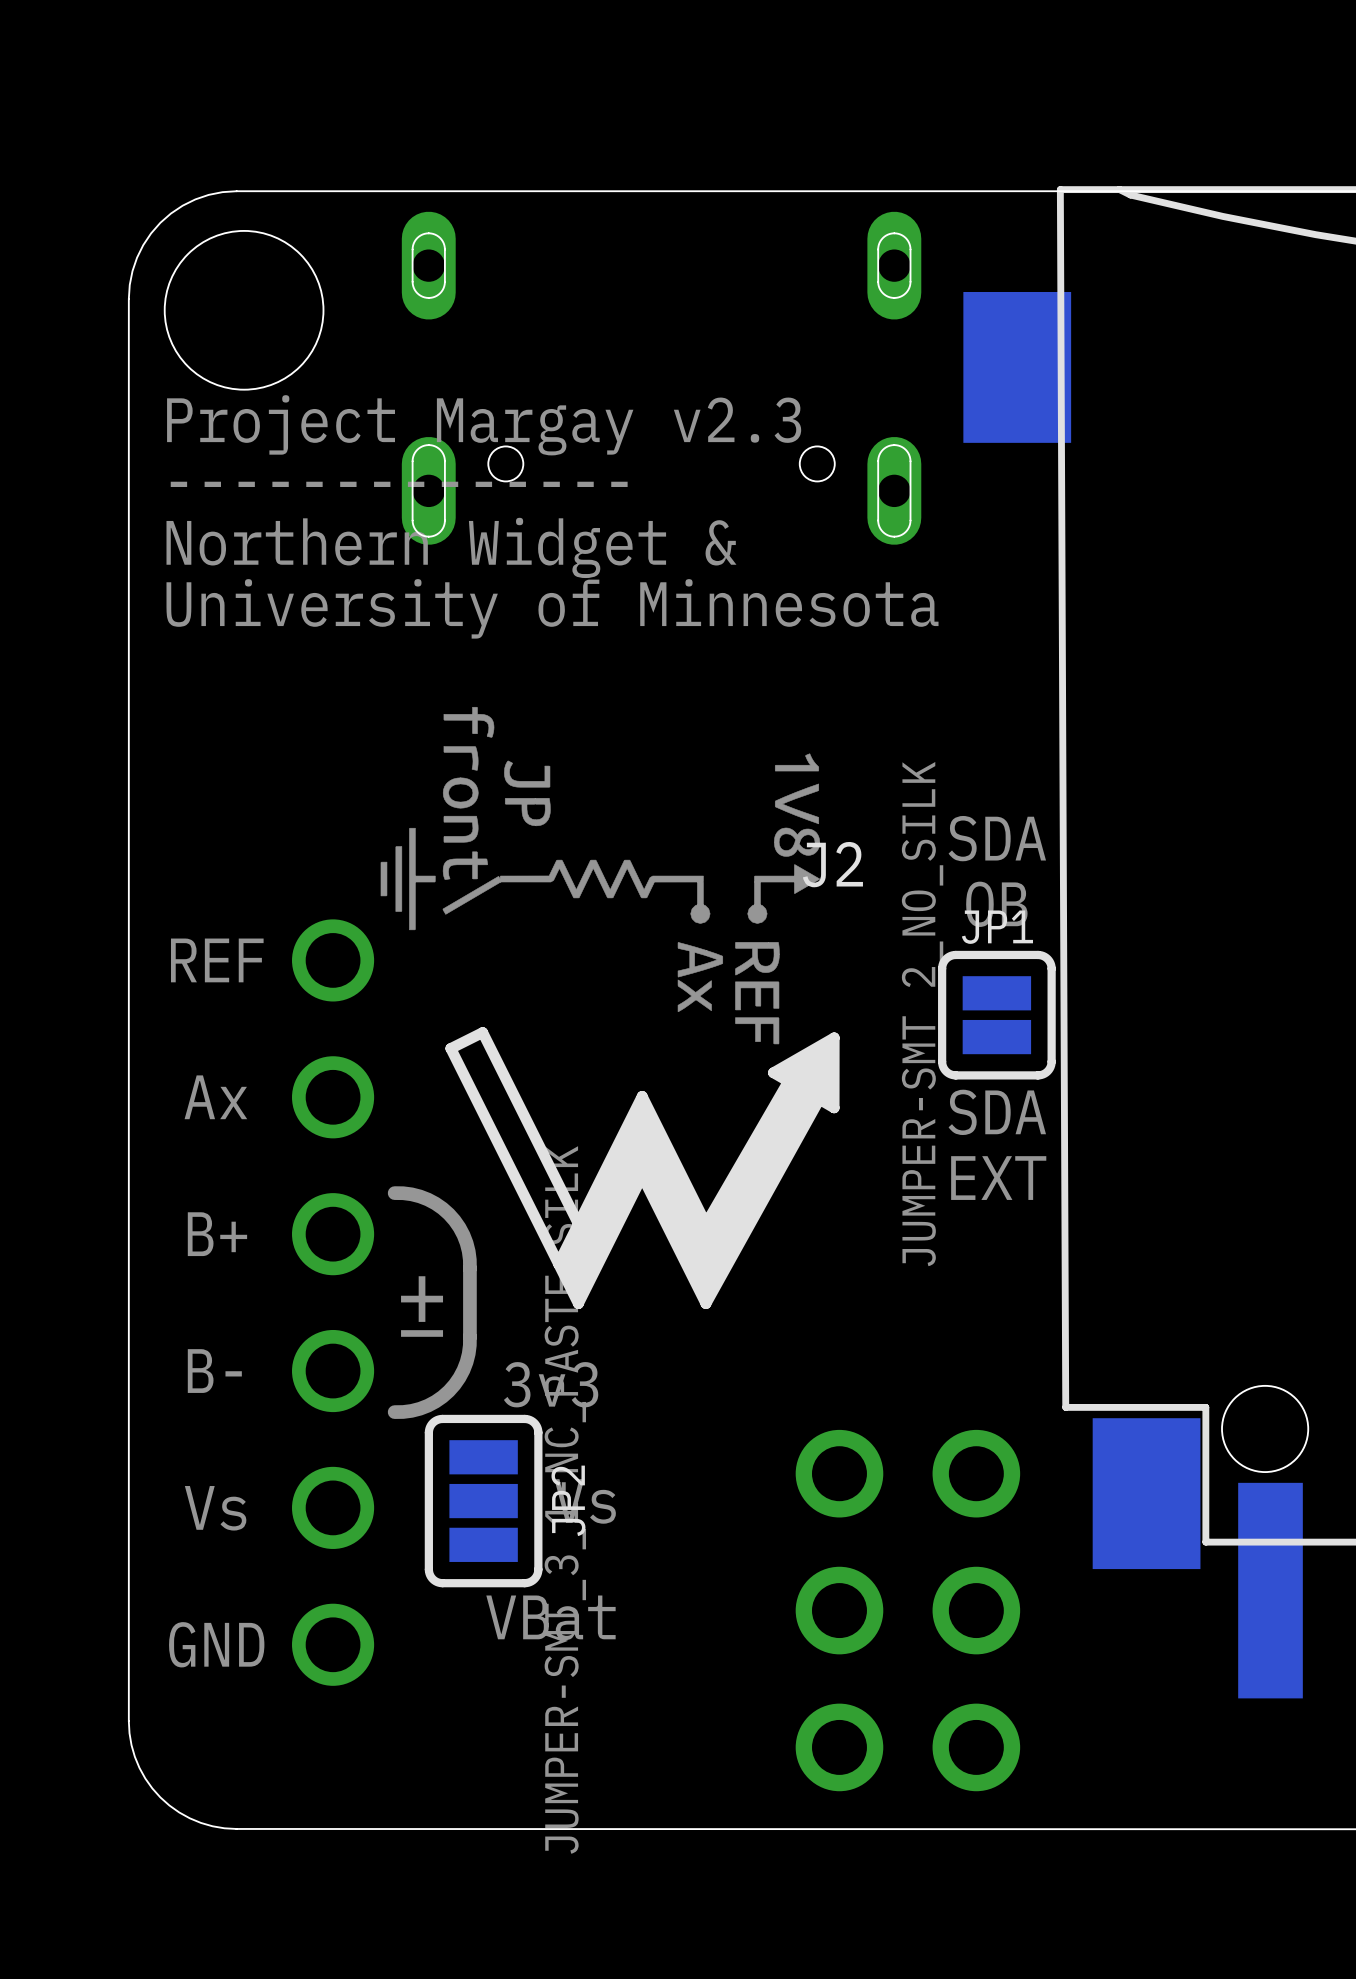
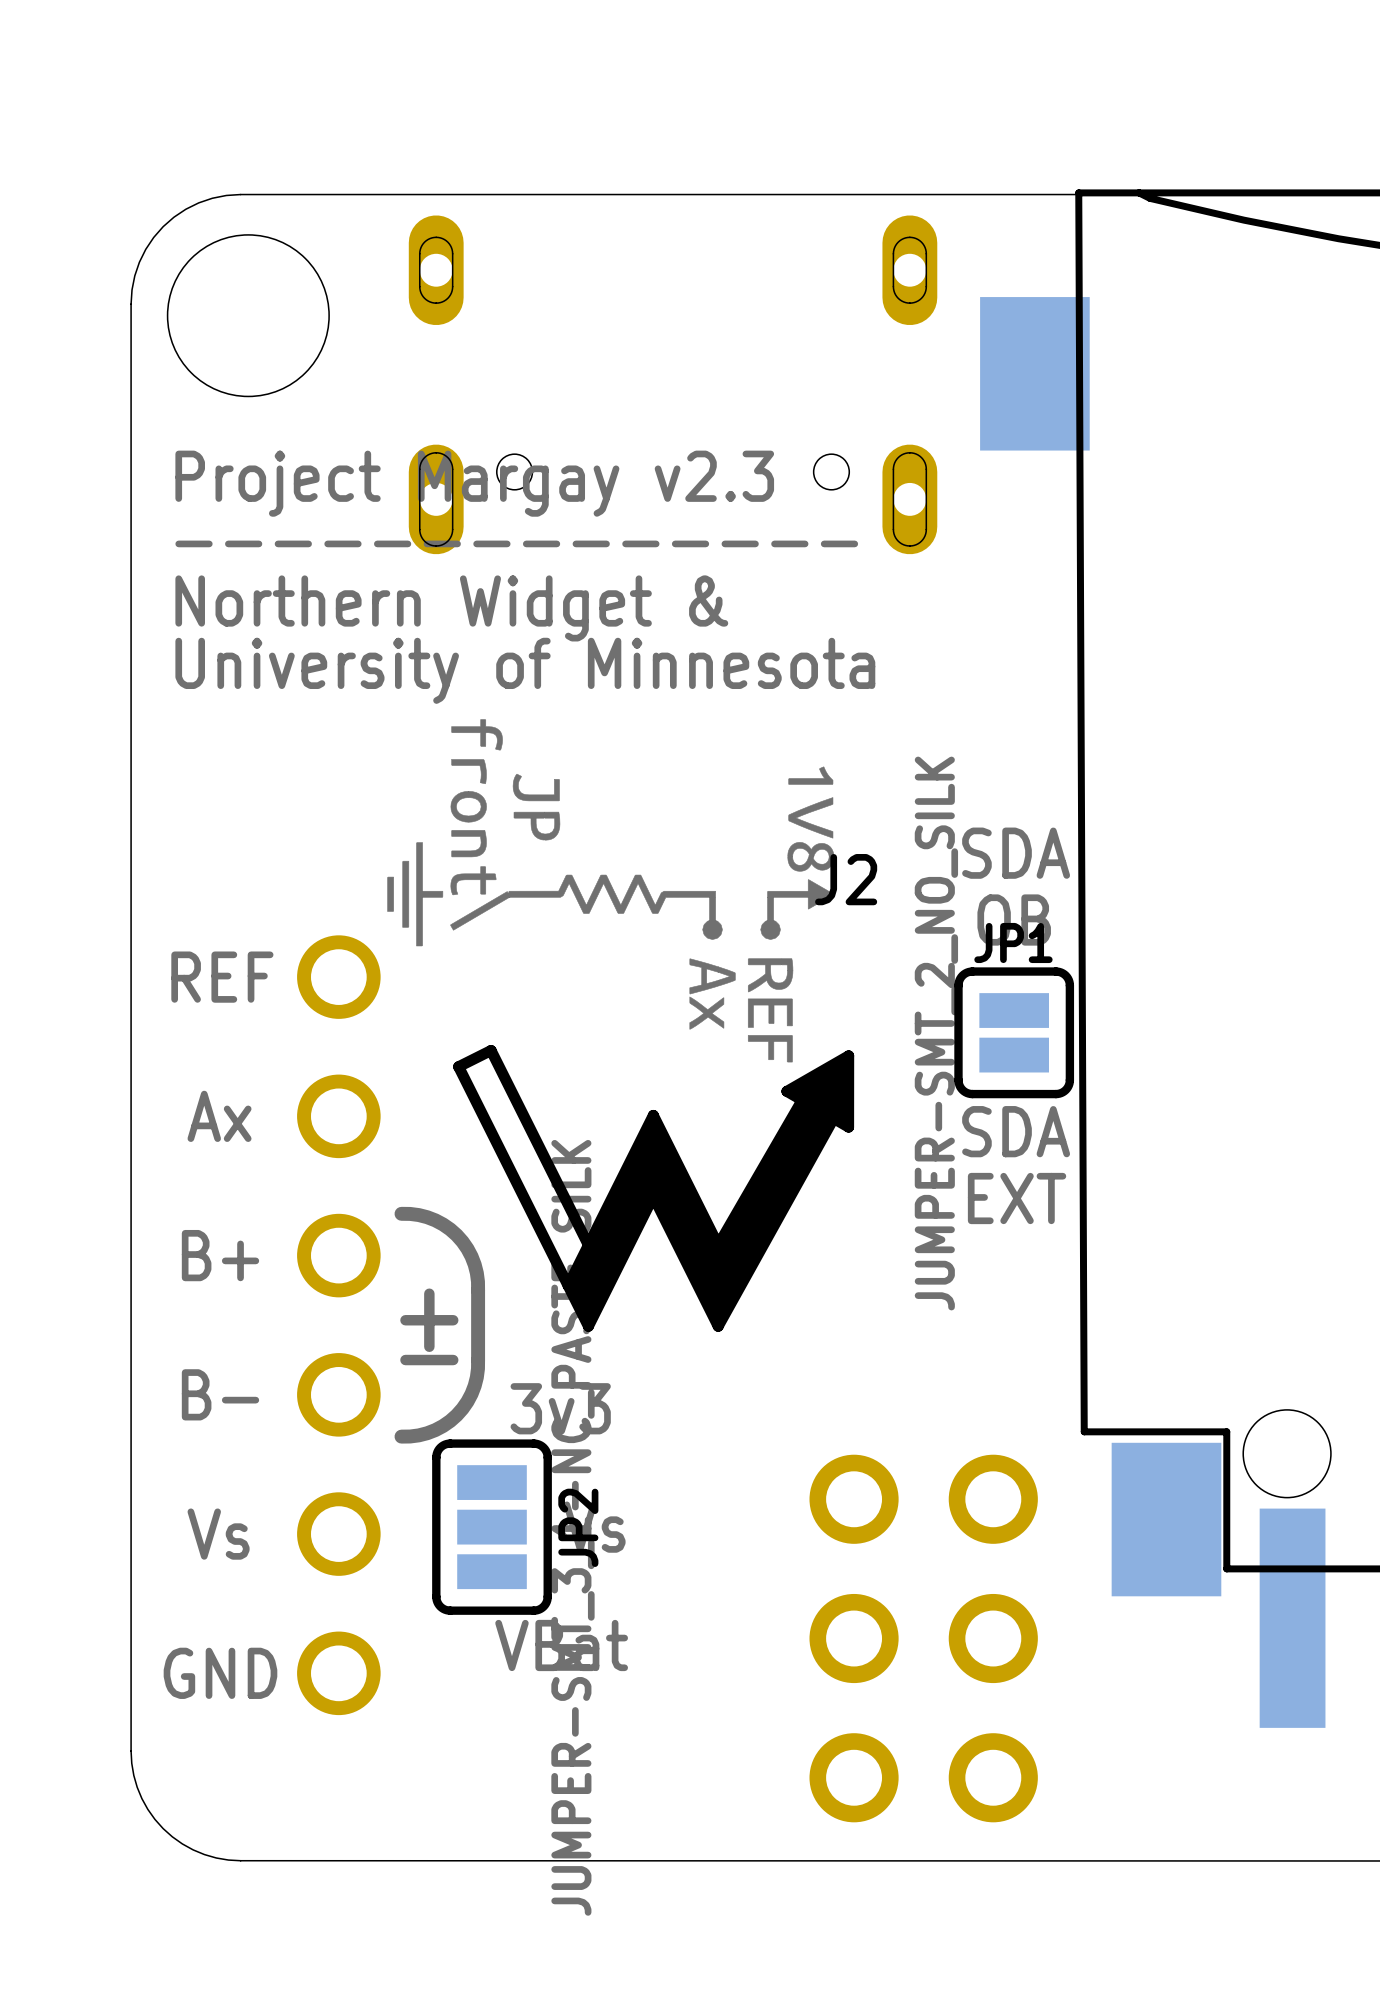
text position: Project Margay v2.3 (484, 425) -> Project Margay v2.3 (474, 483)
text position: -------------- (399, 484) -> -------------- (516, 543)
text position: Northern Widget & (451, 547) -> Northern Widget & (451, 608)
text position: University of Minnesota (552, 608) -> University of Minnesota (525, 670)

